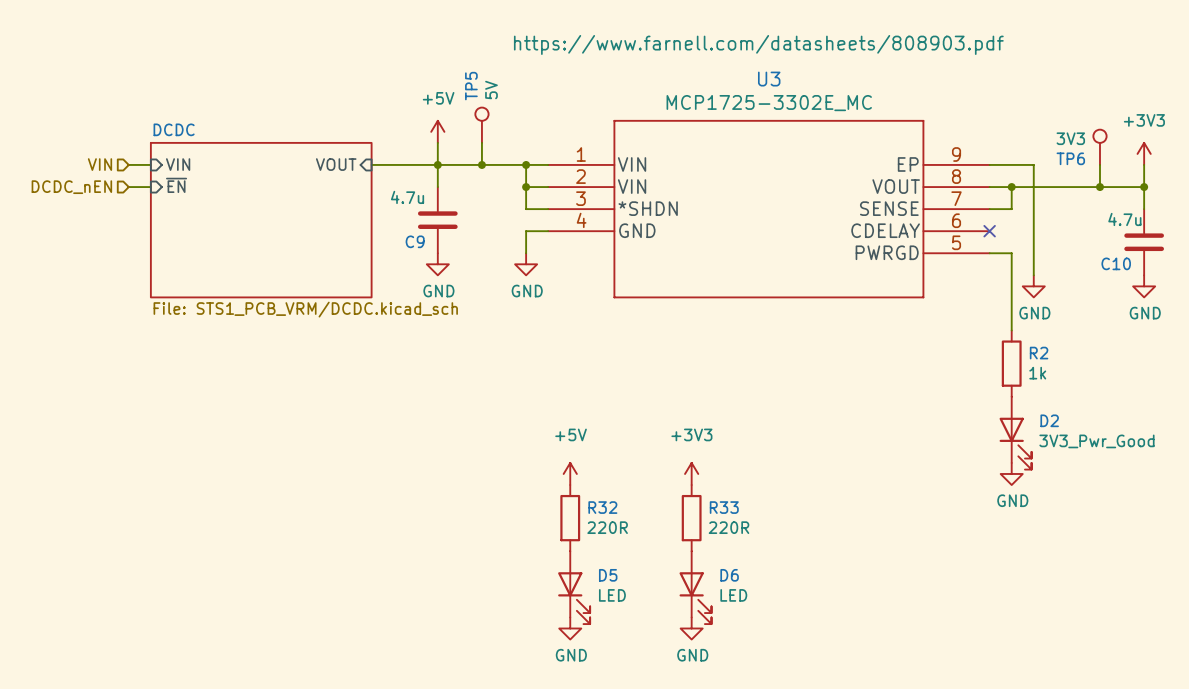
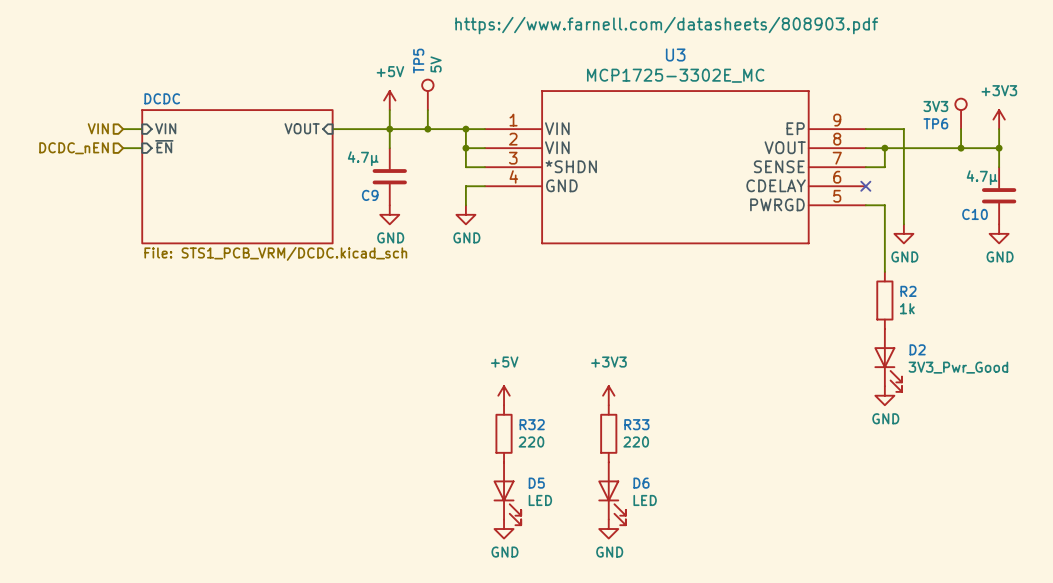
C9 value: 4.7u (407, 197) -> 4.7µ (363, 158)
C10 value: 4.7u (1124, 219) -> 4.7µ (982, 177)
R32 value: 220R (607, 527) -> 220 (531, 442)
R33 value: 220R (729, 527) -> 220 (636, 442)

